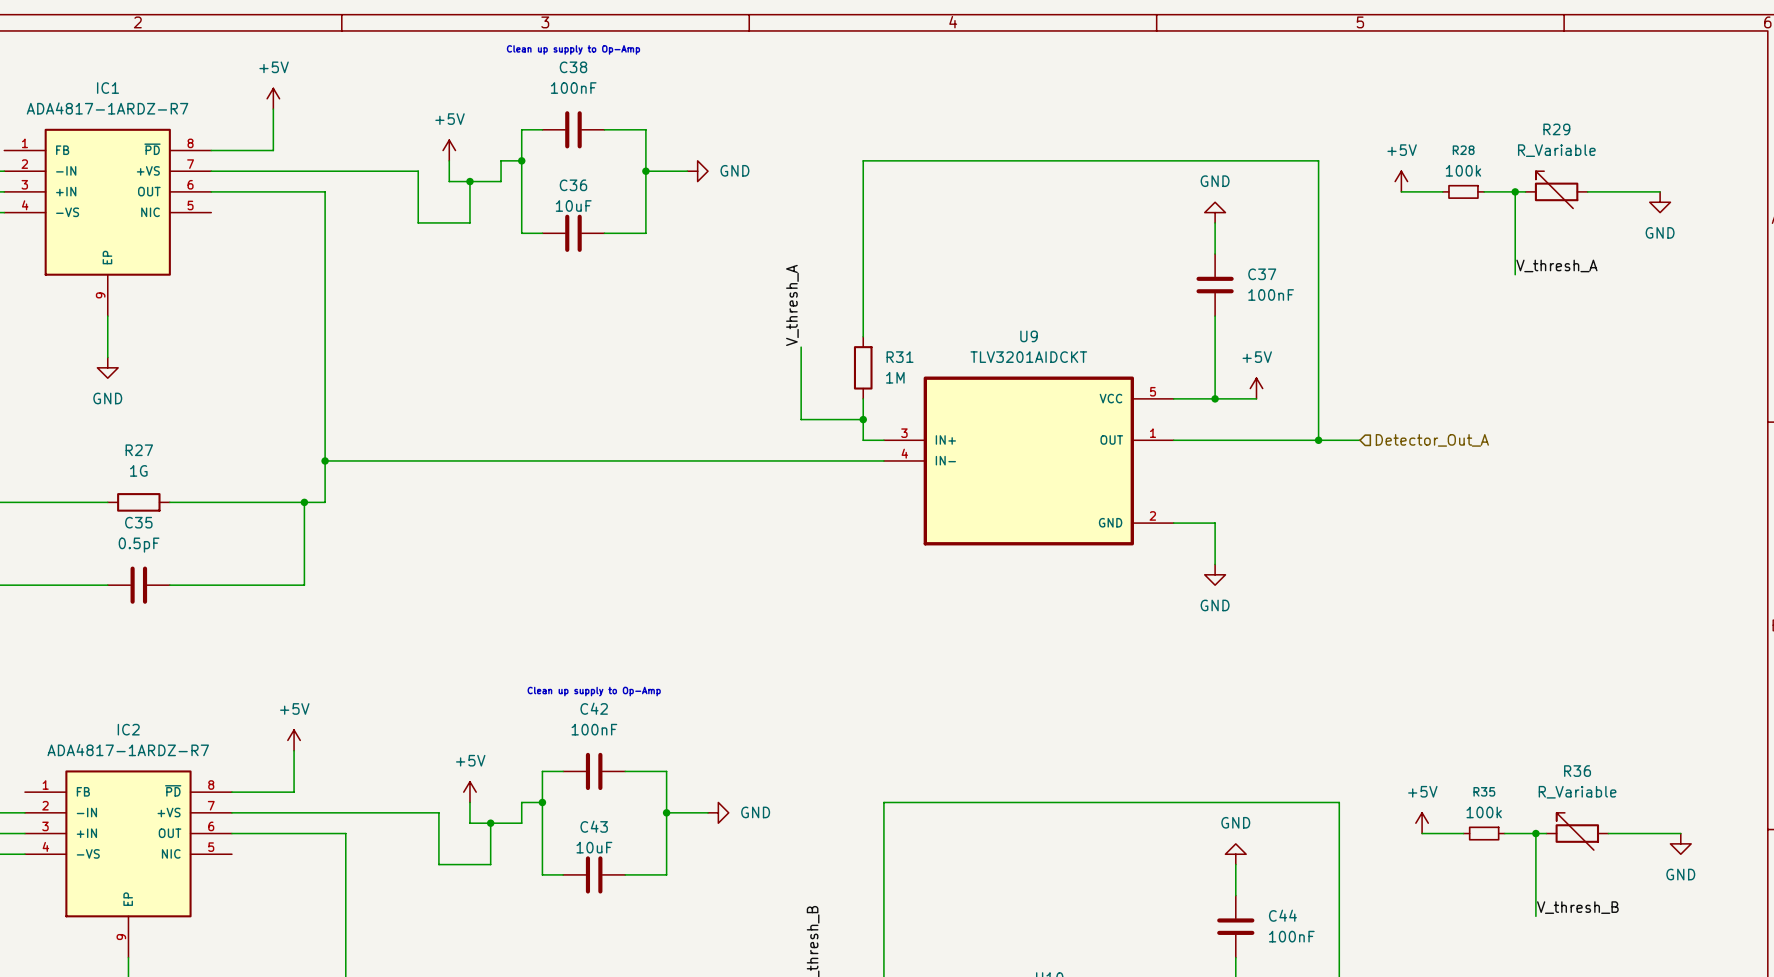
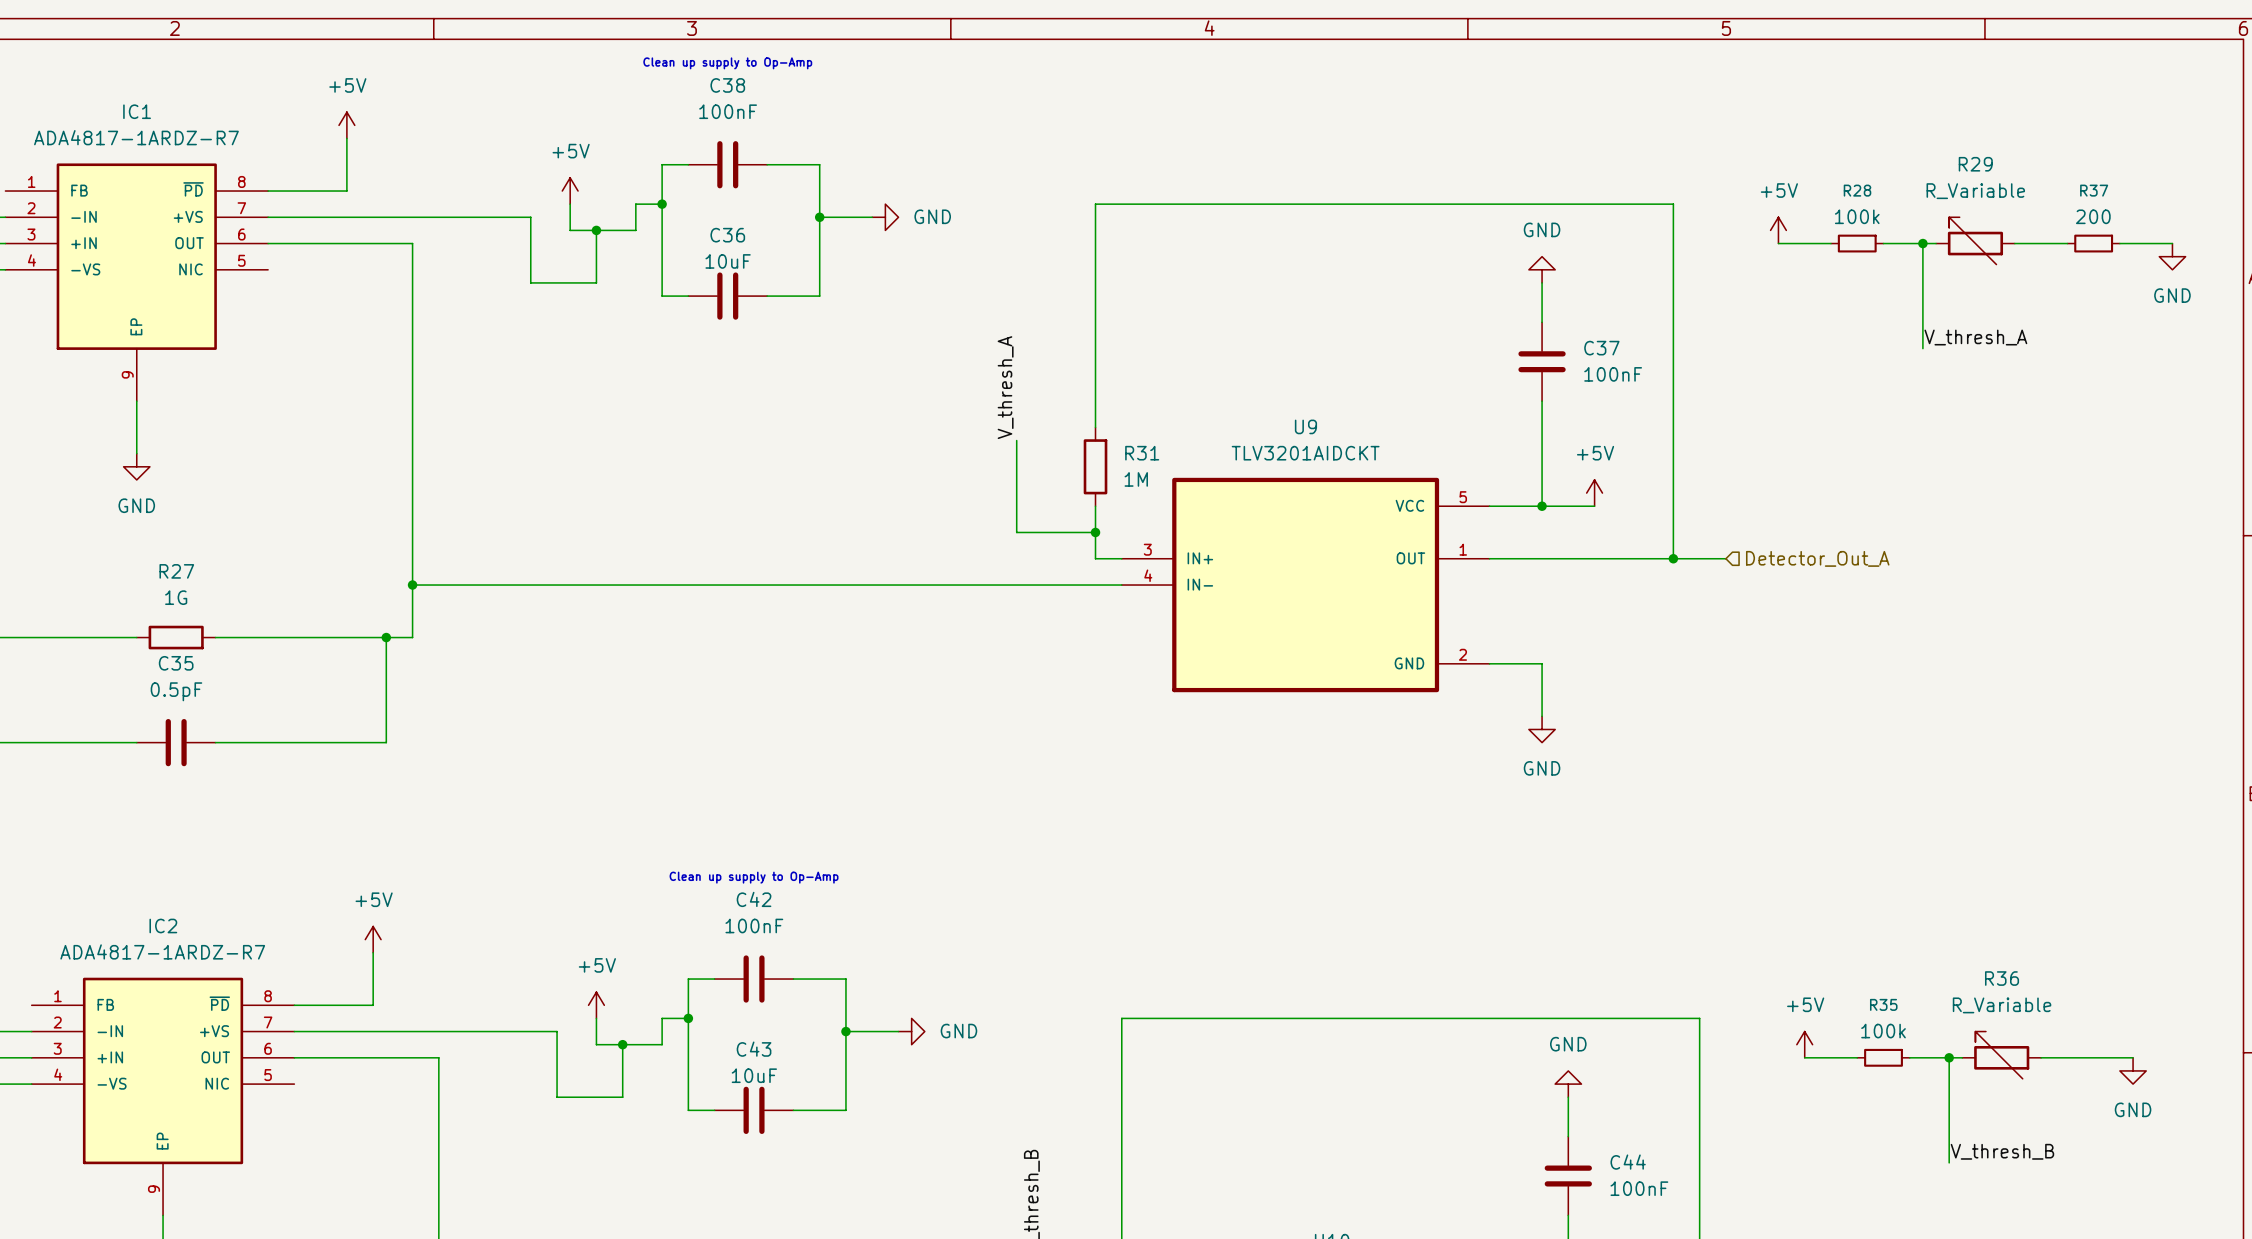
wire: (1629, 191) (1660, 191) -> none
R37: none -> 200 (2093, 243)
wire: none -> (2119, 243) (2172, 243)
power symbol position: GND (1660, 202) -> GND (2172, 256)

